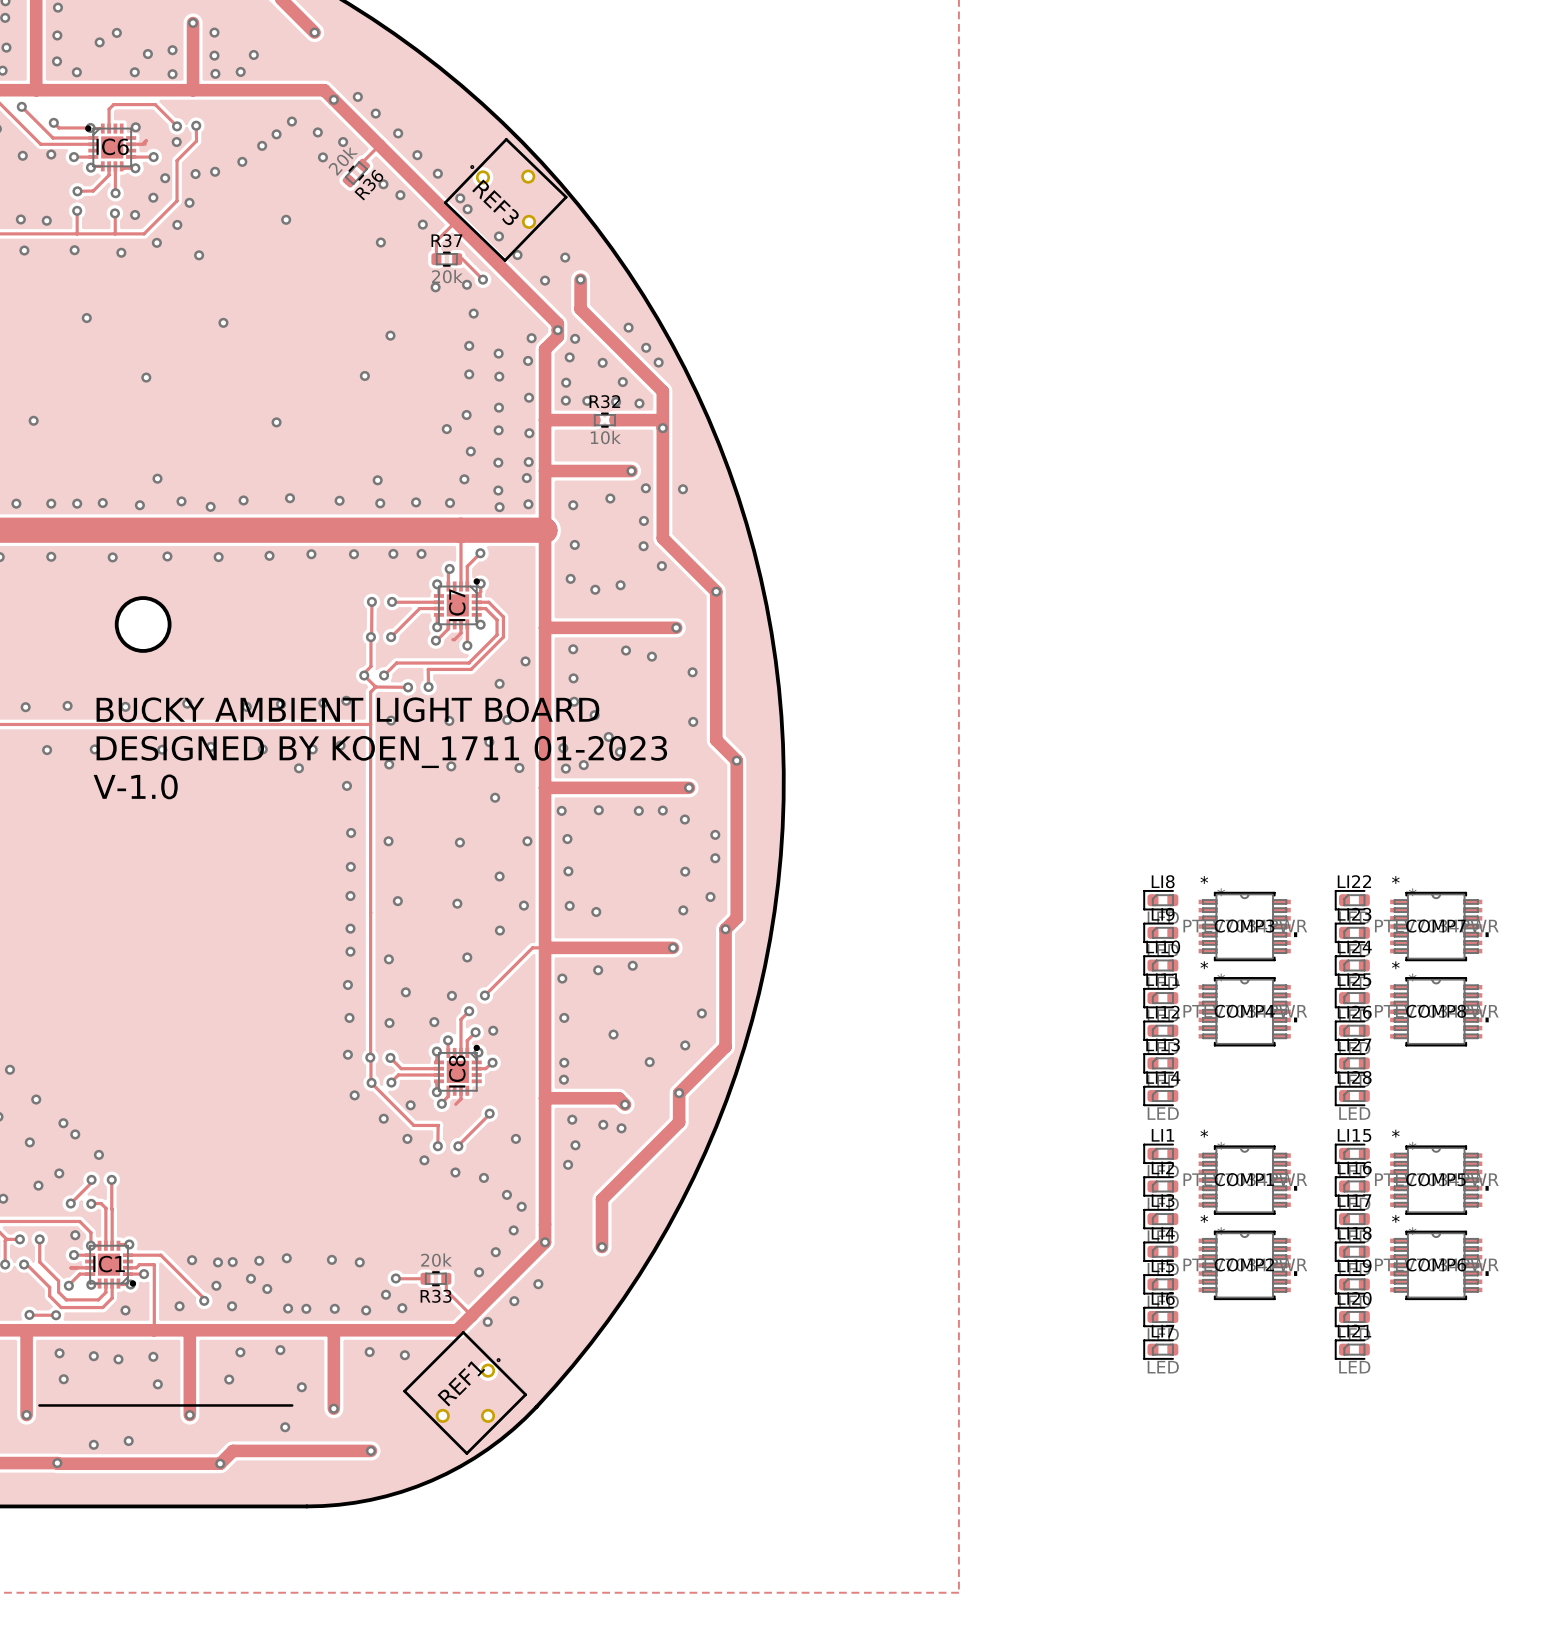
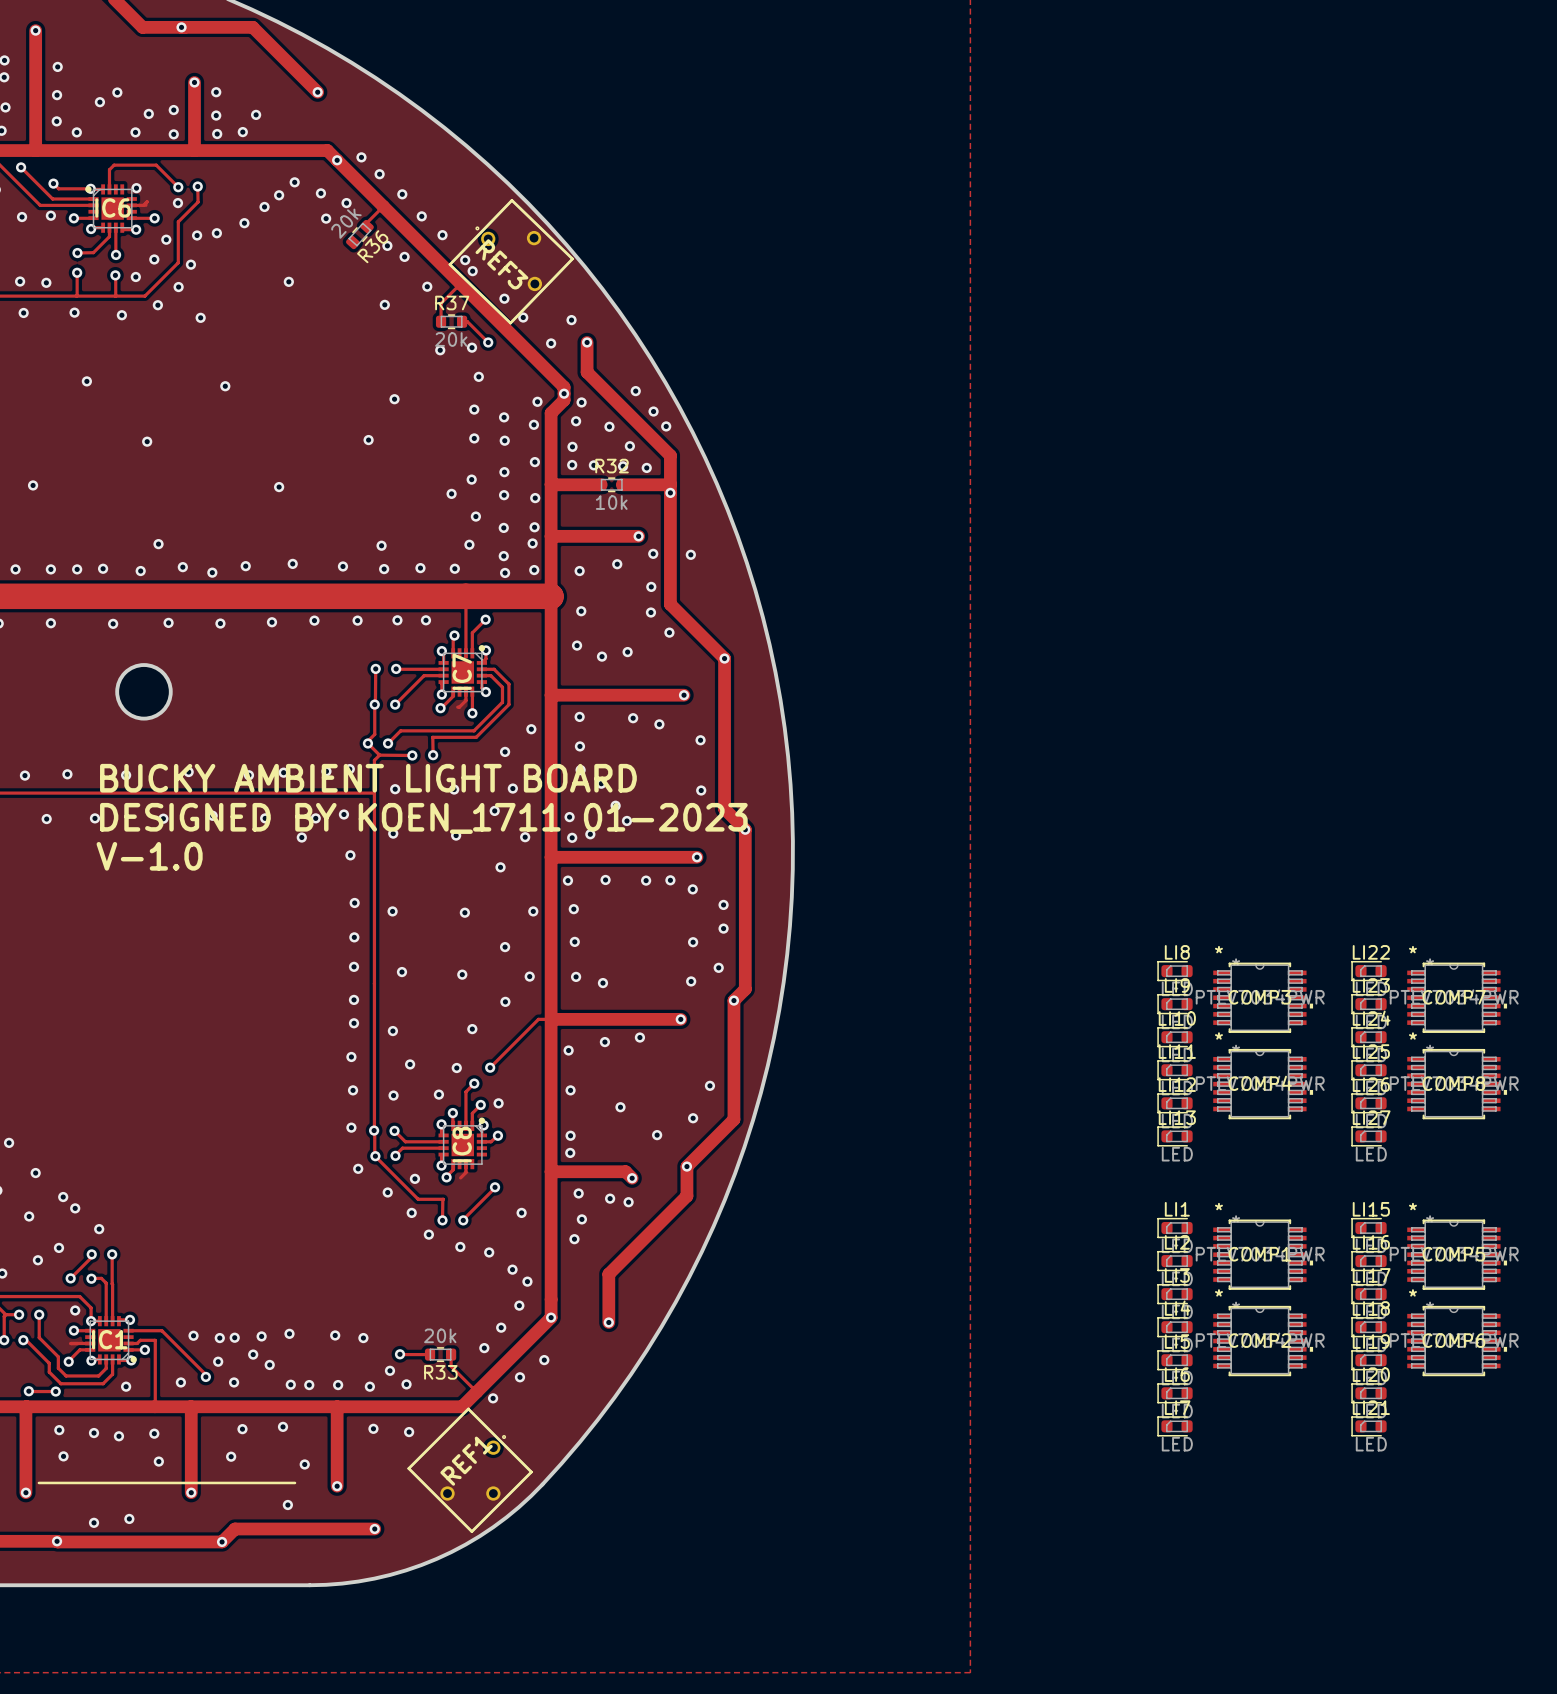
LI14: LED (1160, 1096) -> none
LI28: LED (1352, 1096) -> none

